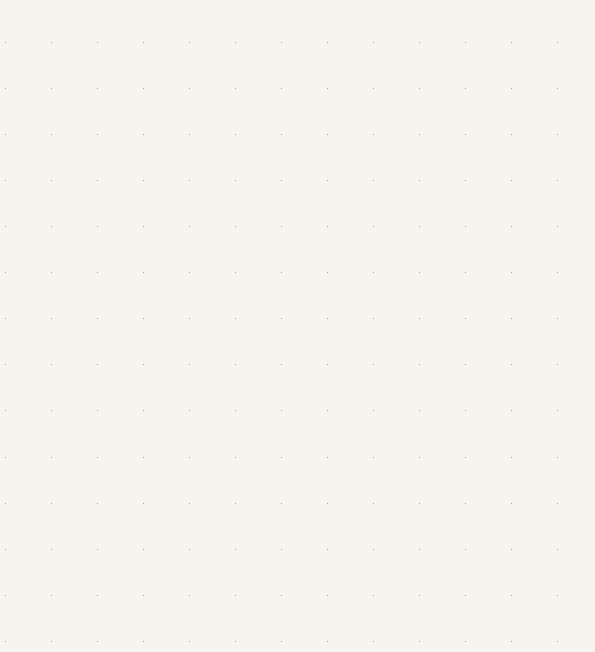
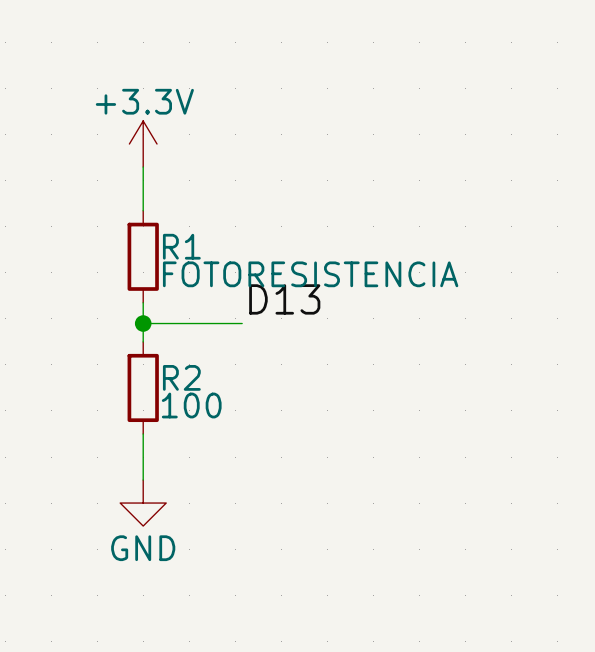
power symbol: none -> +3.3V (143, 144)
wire: none -> (143, 167) (143, 210)
R1: none -> FOTORESISTENCIA (143, 256)
label: none -> D13 (284, 299)
wire: none -> (143, 302) (143, 341)
wire: none -> (143, 323) (242, 323)
junction: none -> (143, 323)
R2: none -> 100 (143, 387)
wire: none -> (143, 433) (143, 480)
power symbol: none -> GND (143, 503)

